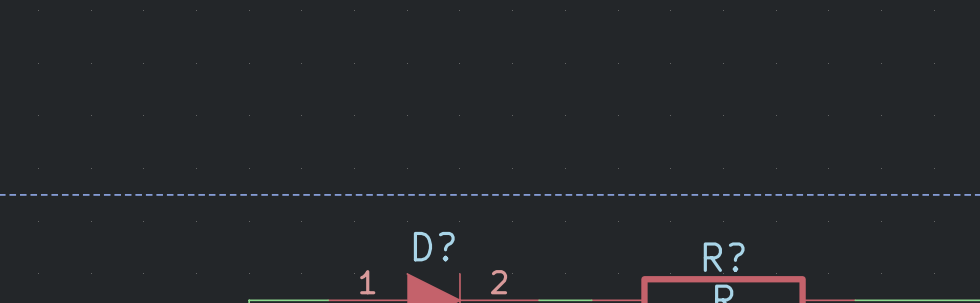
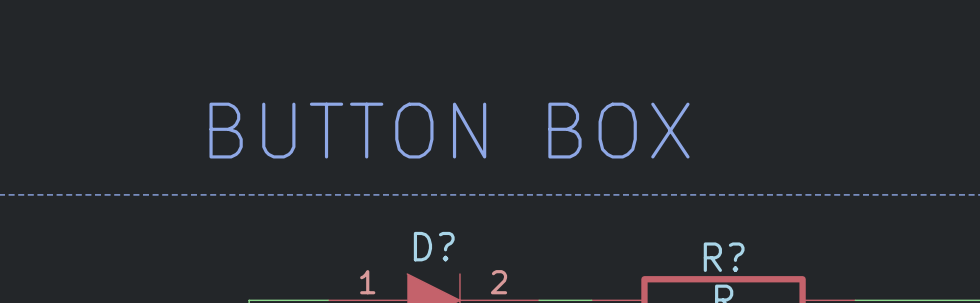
text: none -> BUTTON BOX (449, 130)

